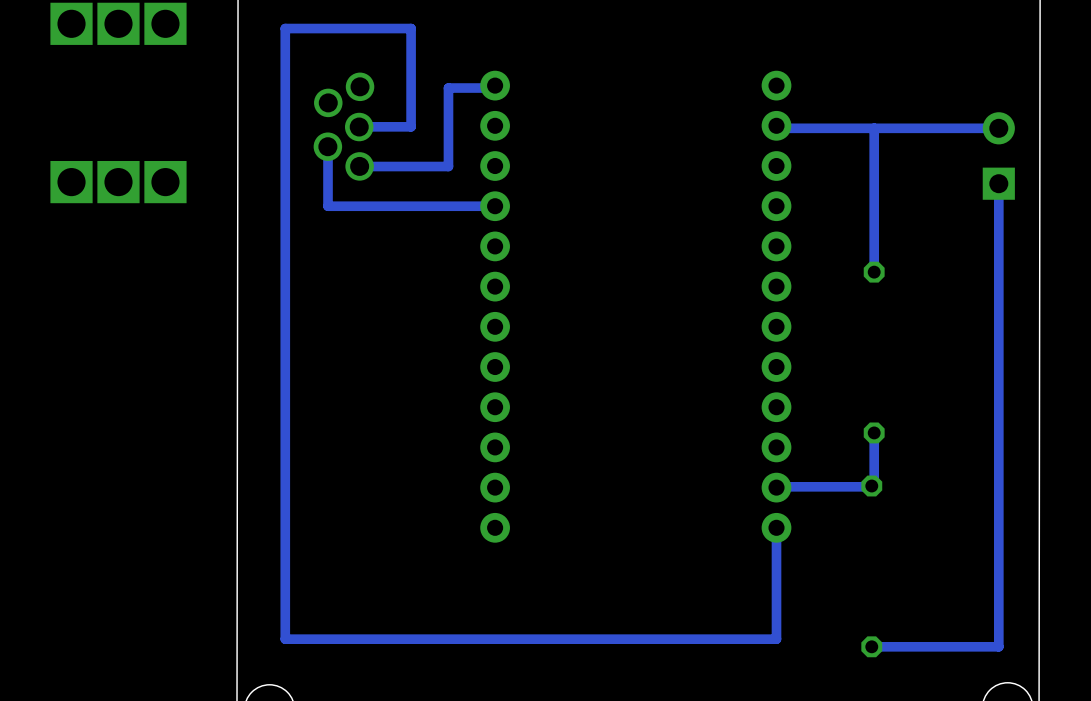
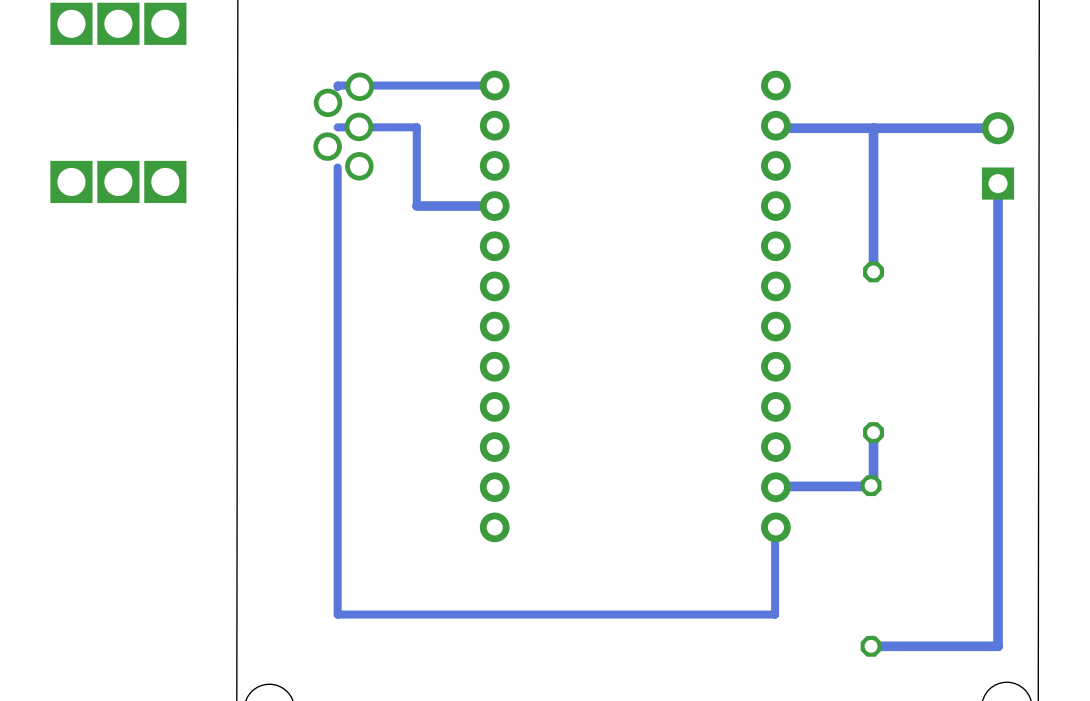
bottom track: none -> (494, 85) (337, 85) (337, 87)
bottom track: (495, 88) (448, 88) (448, 166) (359, 166) -> none
bottom track: (359, 126) (411, 126) (411, 28) (285, 28) (285, 639) (776, 639) (776, 527) -> (337, 167) (337, 614) (775, 614) (775, 527)
bottom track: (328, 146) (328, 206) (417, 206) -> (337, 127) (416, 127) (416, 206)

